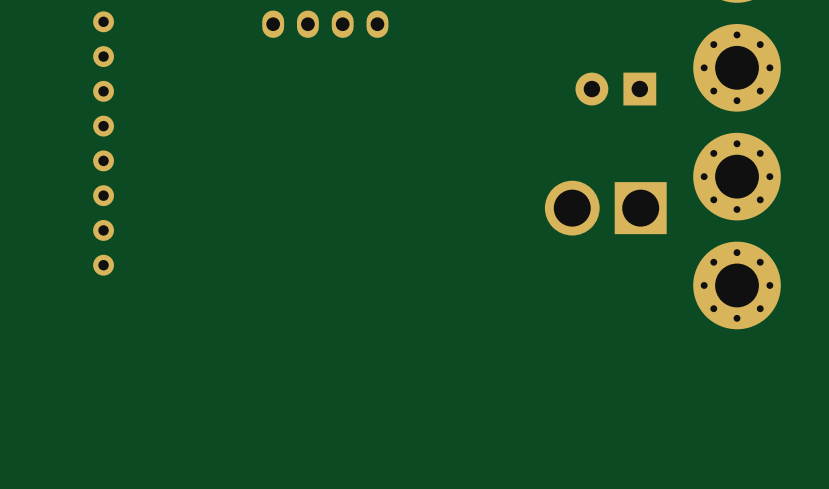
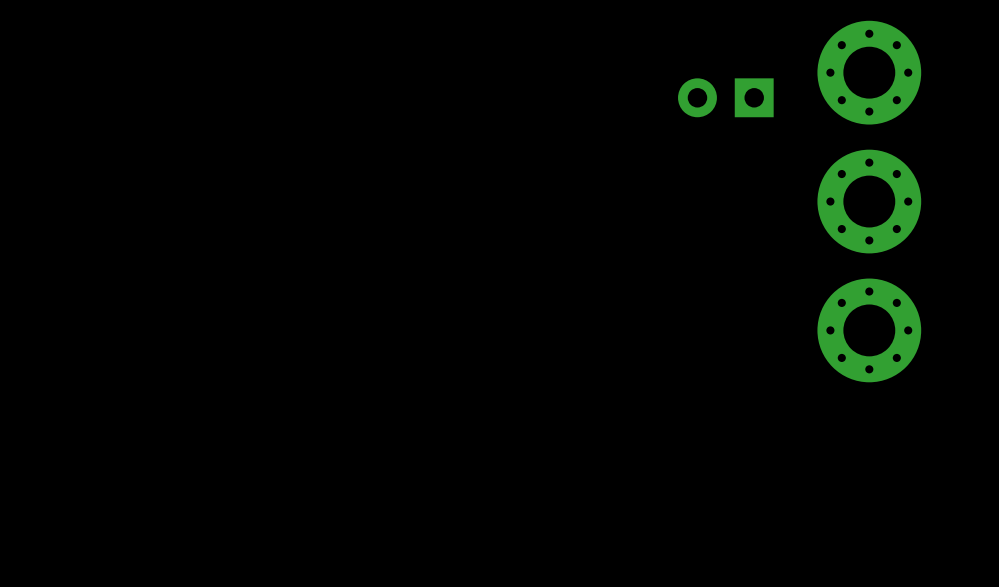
part: (325, 24) -> none
part: (103, 143) -> none
part: (605, 208) -> none

